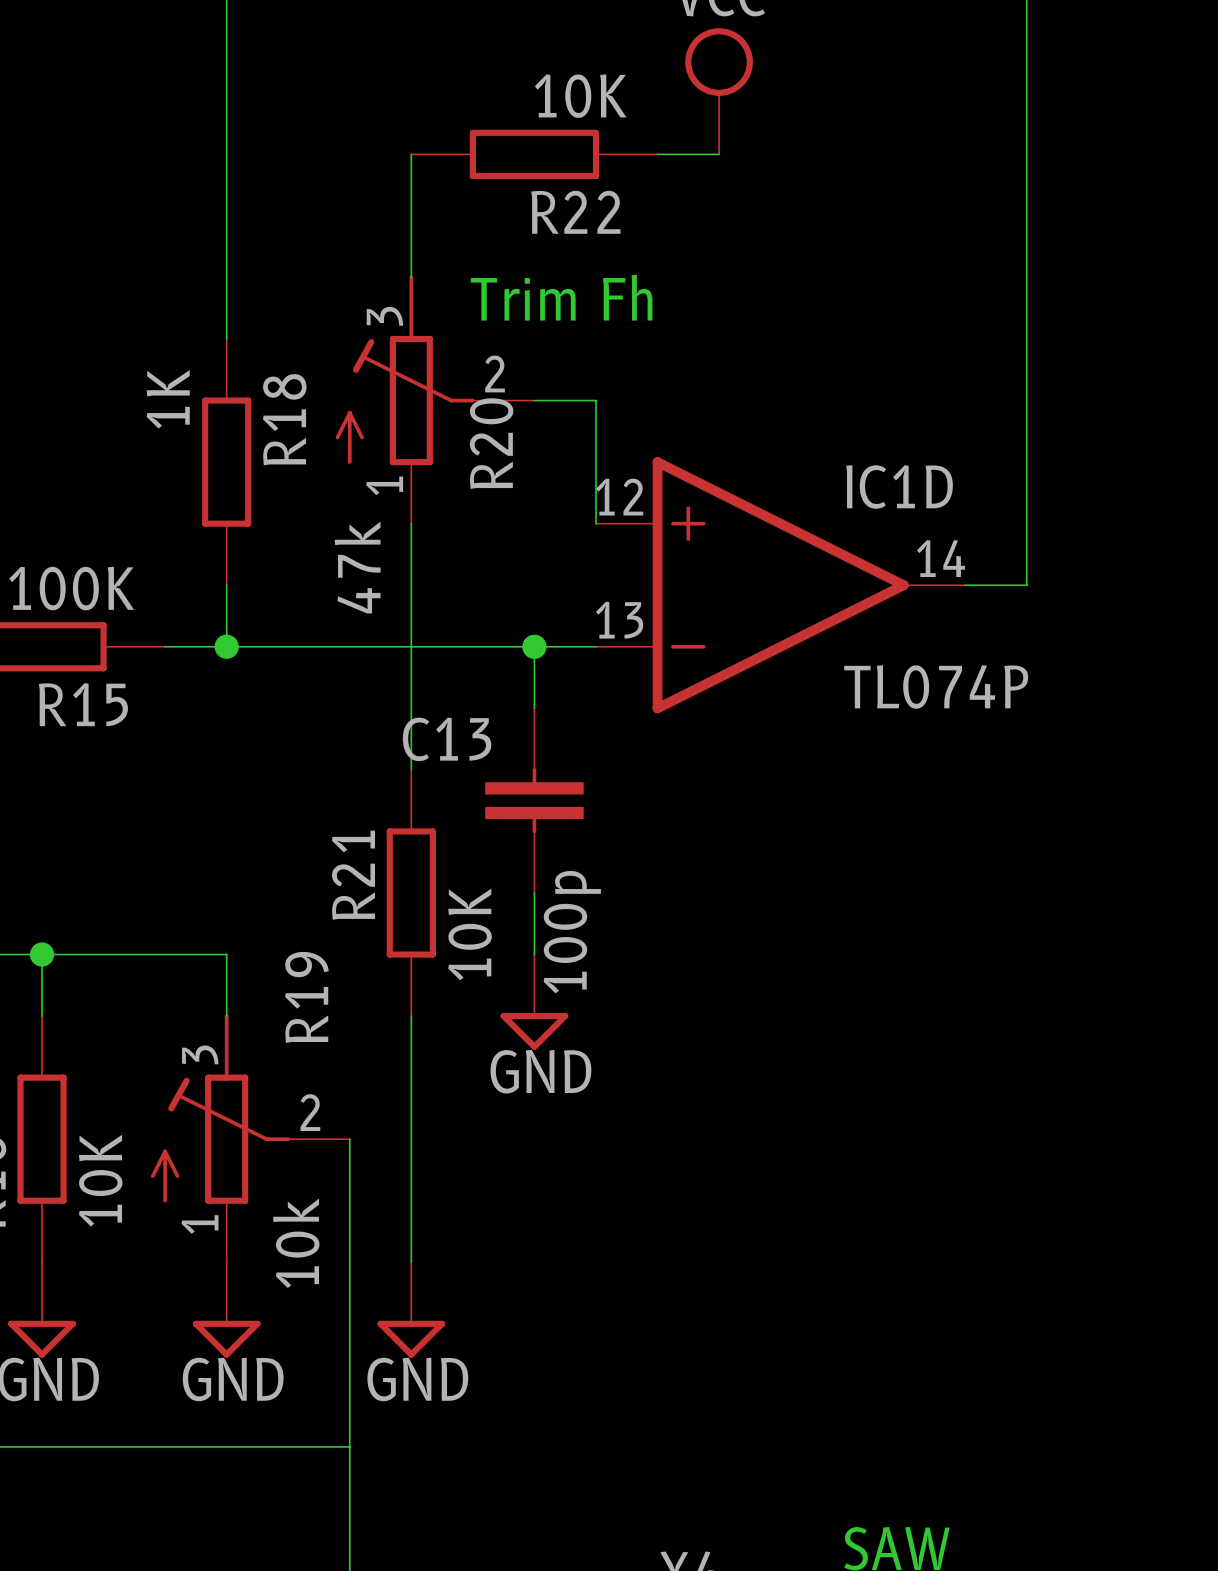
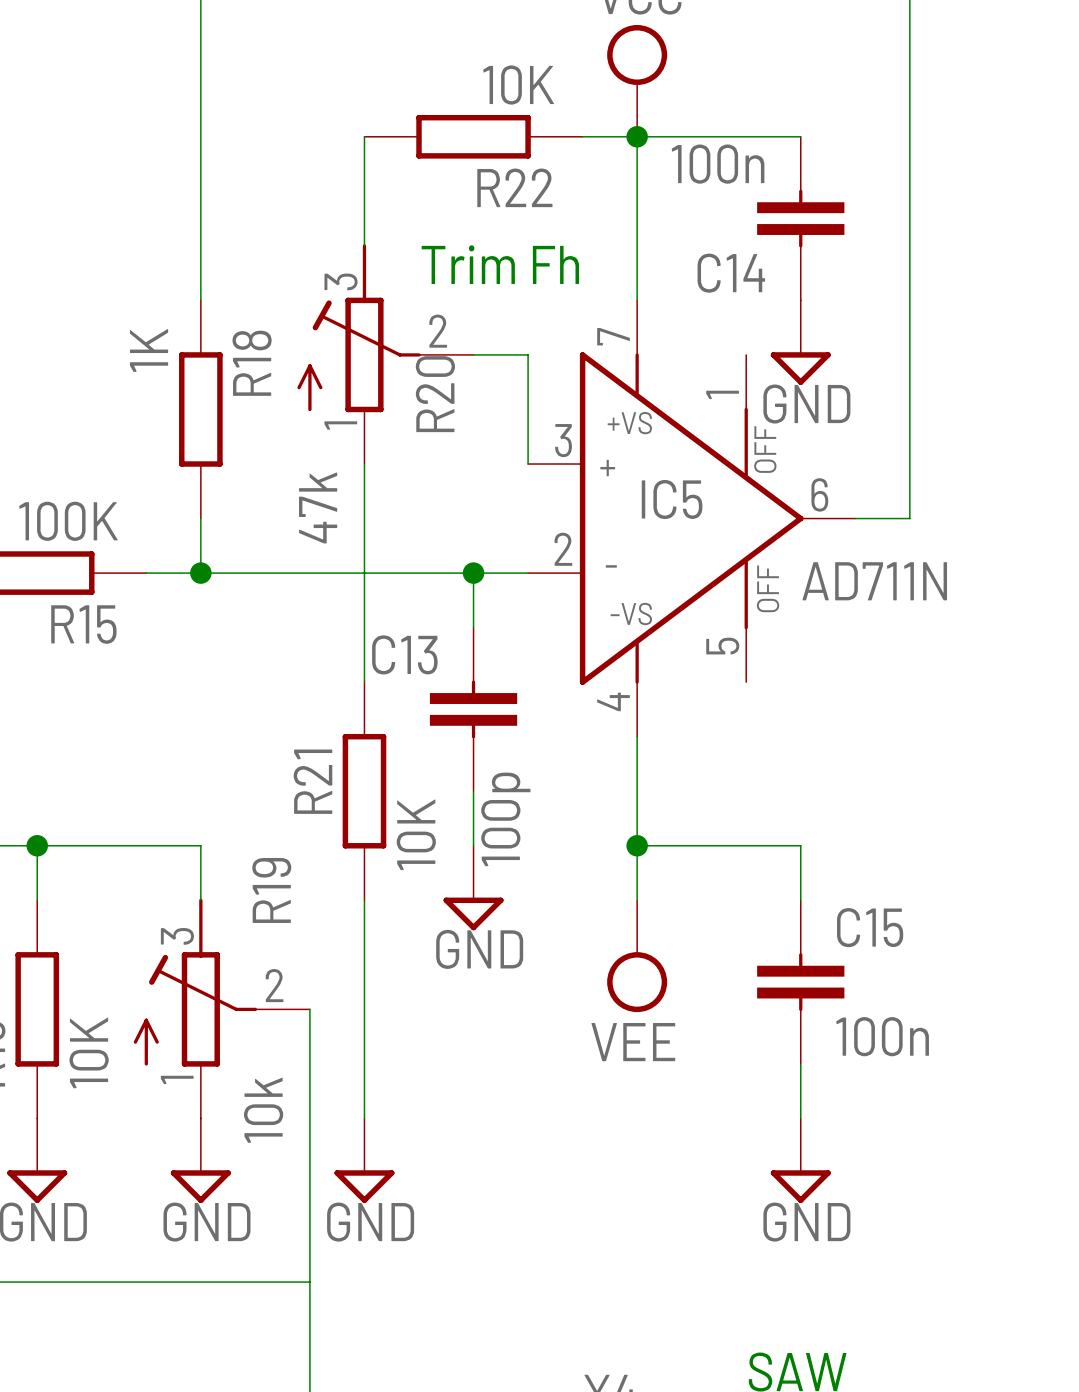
junction: none -> (637, 136)
wire: none -> (800, 136) (637, 136) (637, 300)
C14: none -> 100n (800, 218)
power symbol: none -> GND (800, 342)
IC1D: TL074P (780, 585) -> none
IC5: none -> AD711N (691, 518)
wire: none -> (637, 736) (637, 900)
wire: none -> (637, 845) (800, 845) (800, 900)
junction: none -> (637, 845)
power symbol: none -> VEE (637, 956)
C15: none -> 100n (800, 982)
wire: none -> (800, 1063) (800, 1118)
power symbol: none -> GND (800, 1160)

